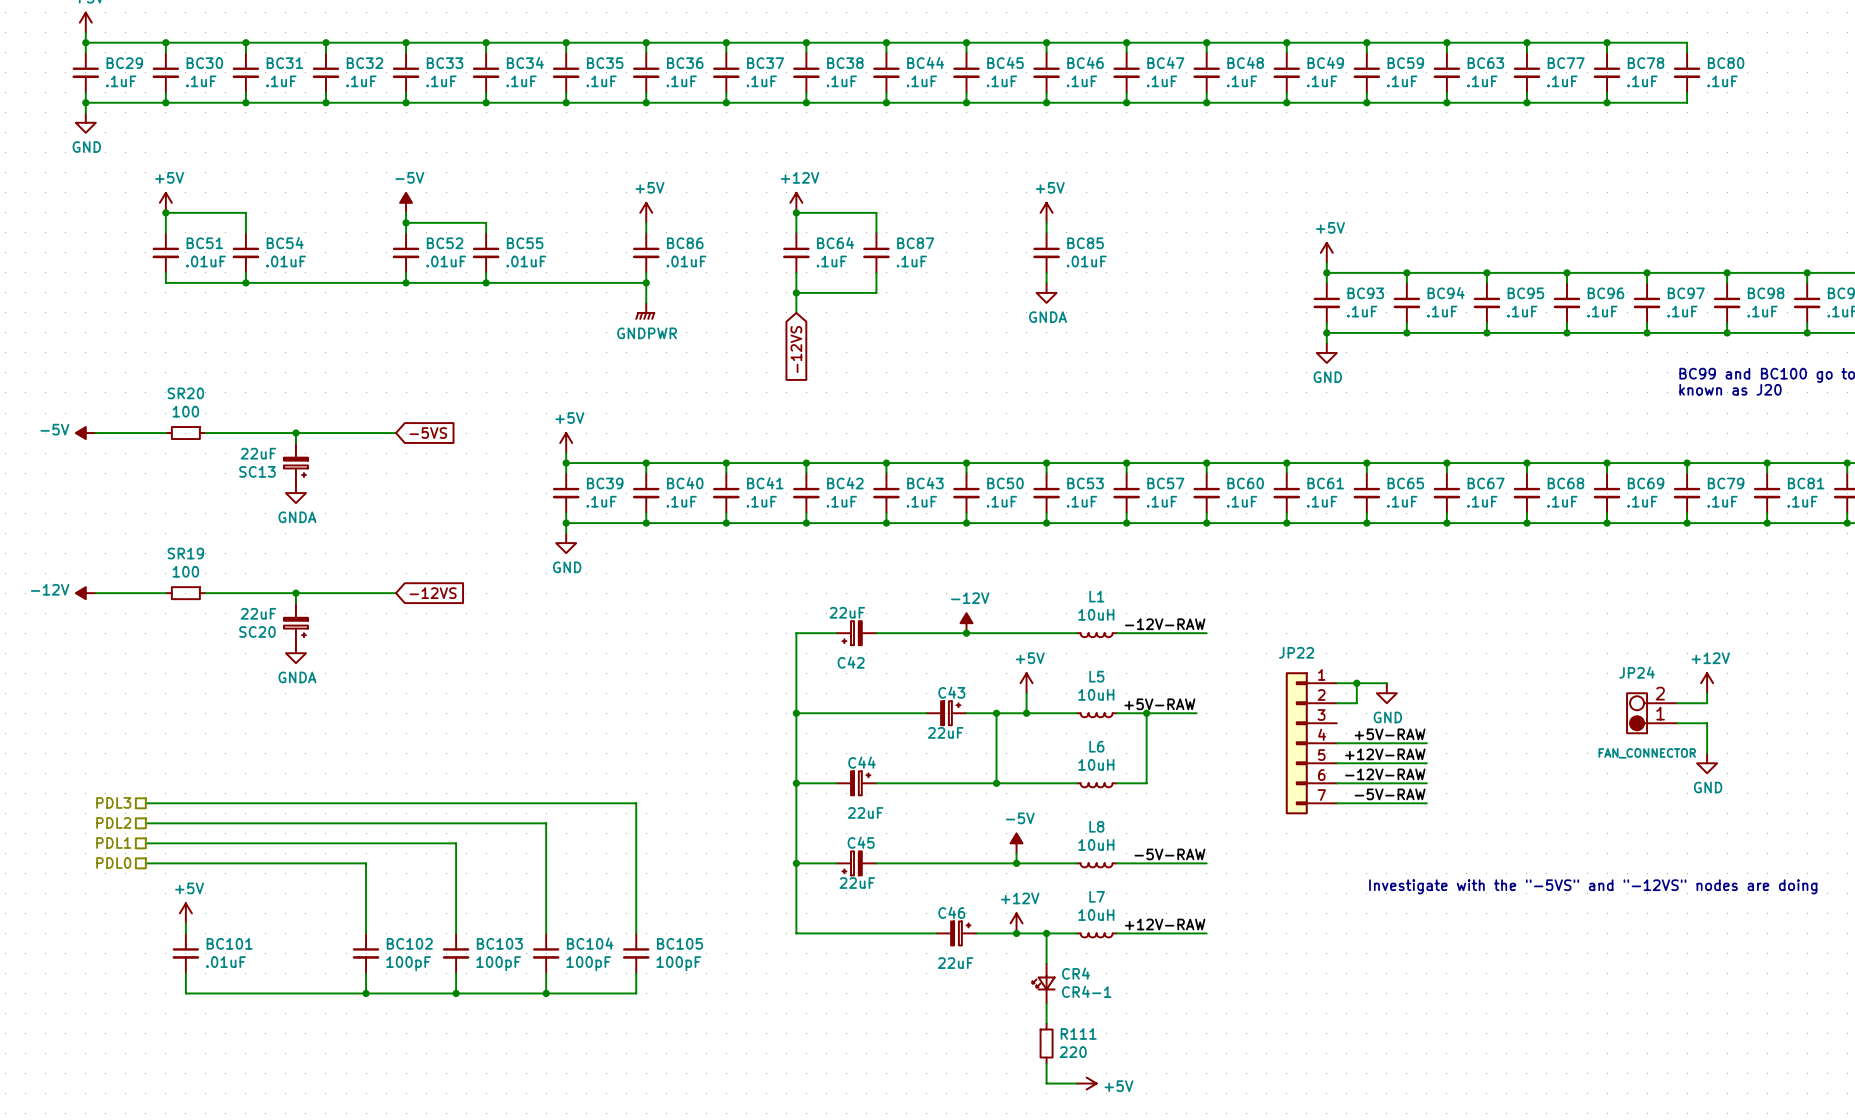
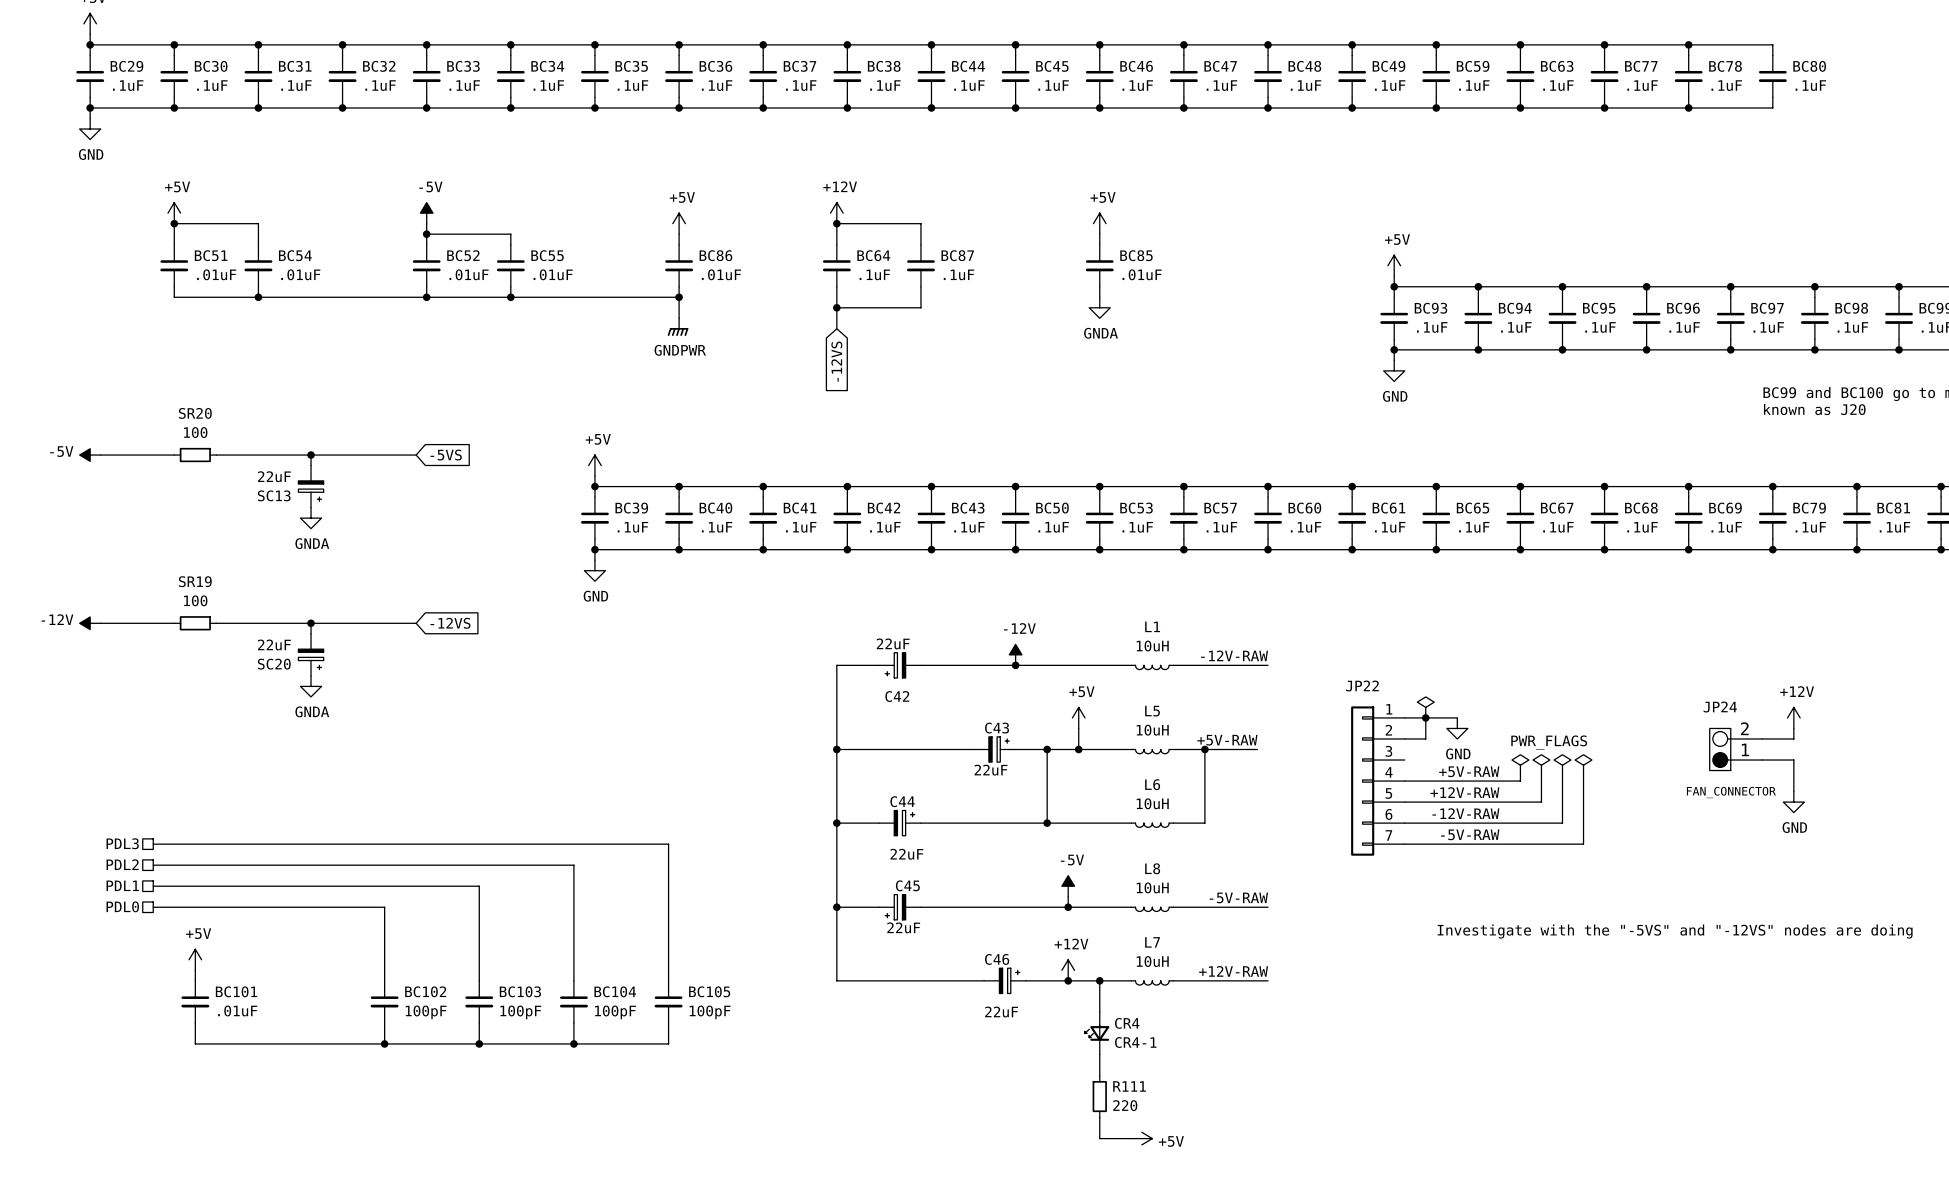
power symbol: none -> (1425, 707)
text: none -> PWR_FLAGS (1549, 742)
power symbol: none -> (1520, 765)
power symbol: none -> (1541, 765)
power symbol: none -> (1562, 765)
power symbol: none -> (1583, 765)
wire: none -> (1520, 775) (1520, 781) (1499, 781)
wire: none -> (1541, 775) (1541, 802) (1499, 802)
wire: none -> (1562, 775) (1562, 823) (1499, 823)
wire: none -> (1583, 775) (1583, 844) (1499, 844)

